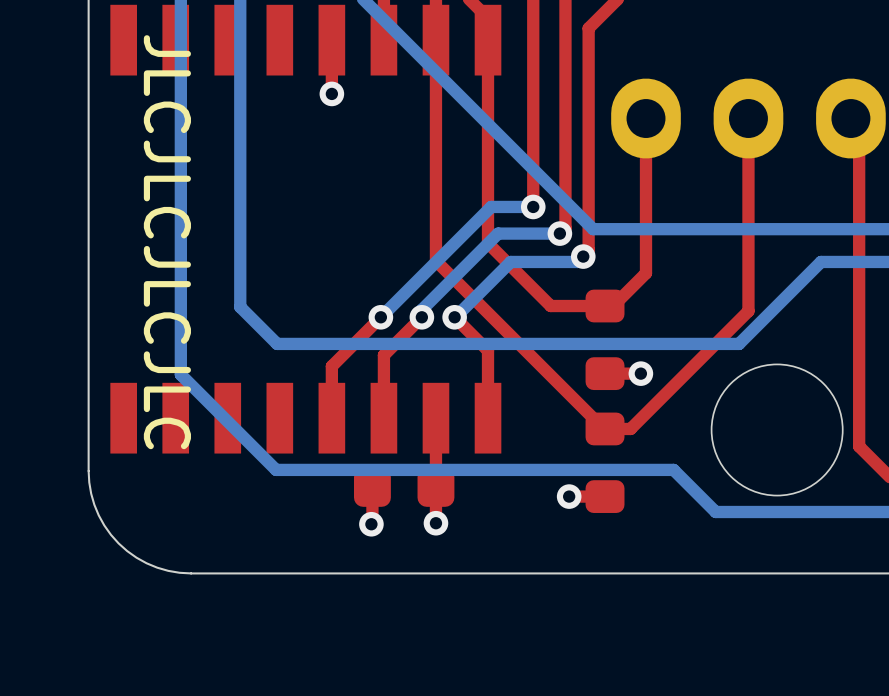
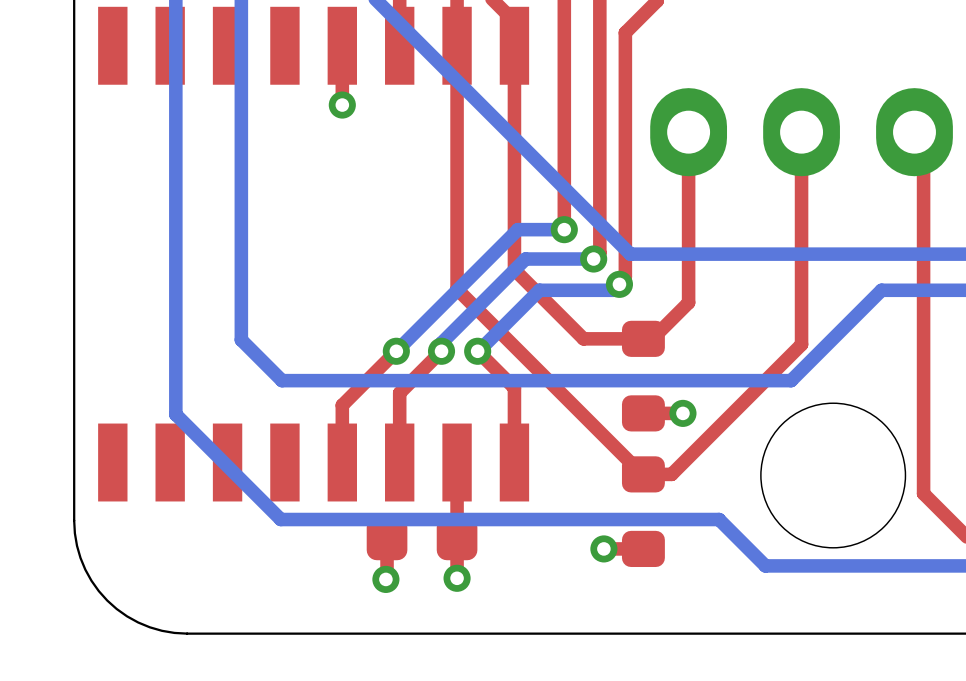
text: JLCJLCJLCJLC (167, 242) -> none

